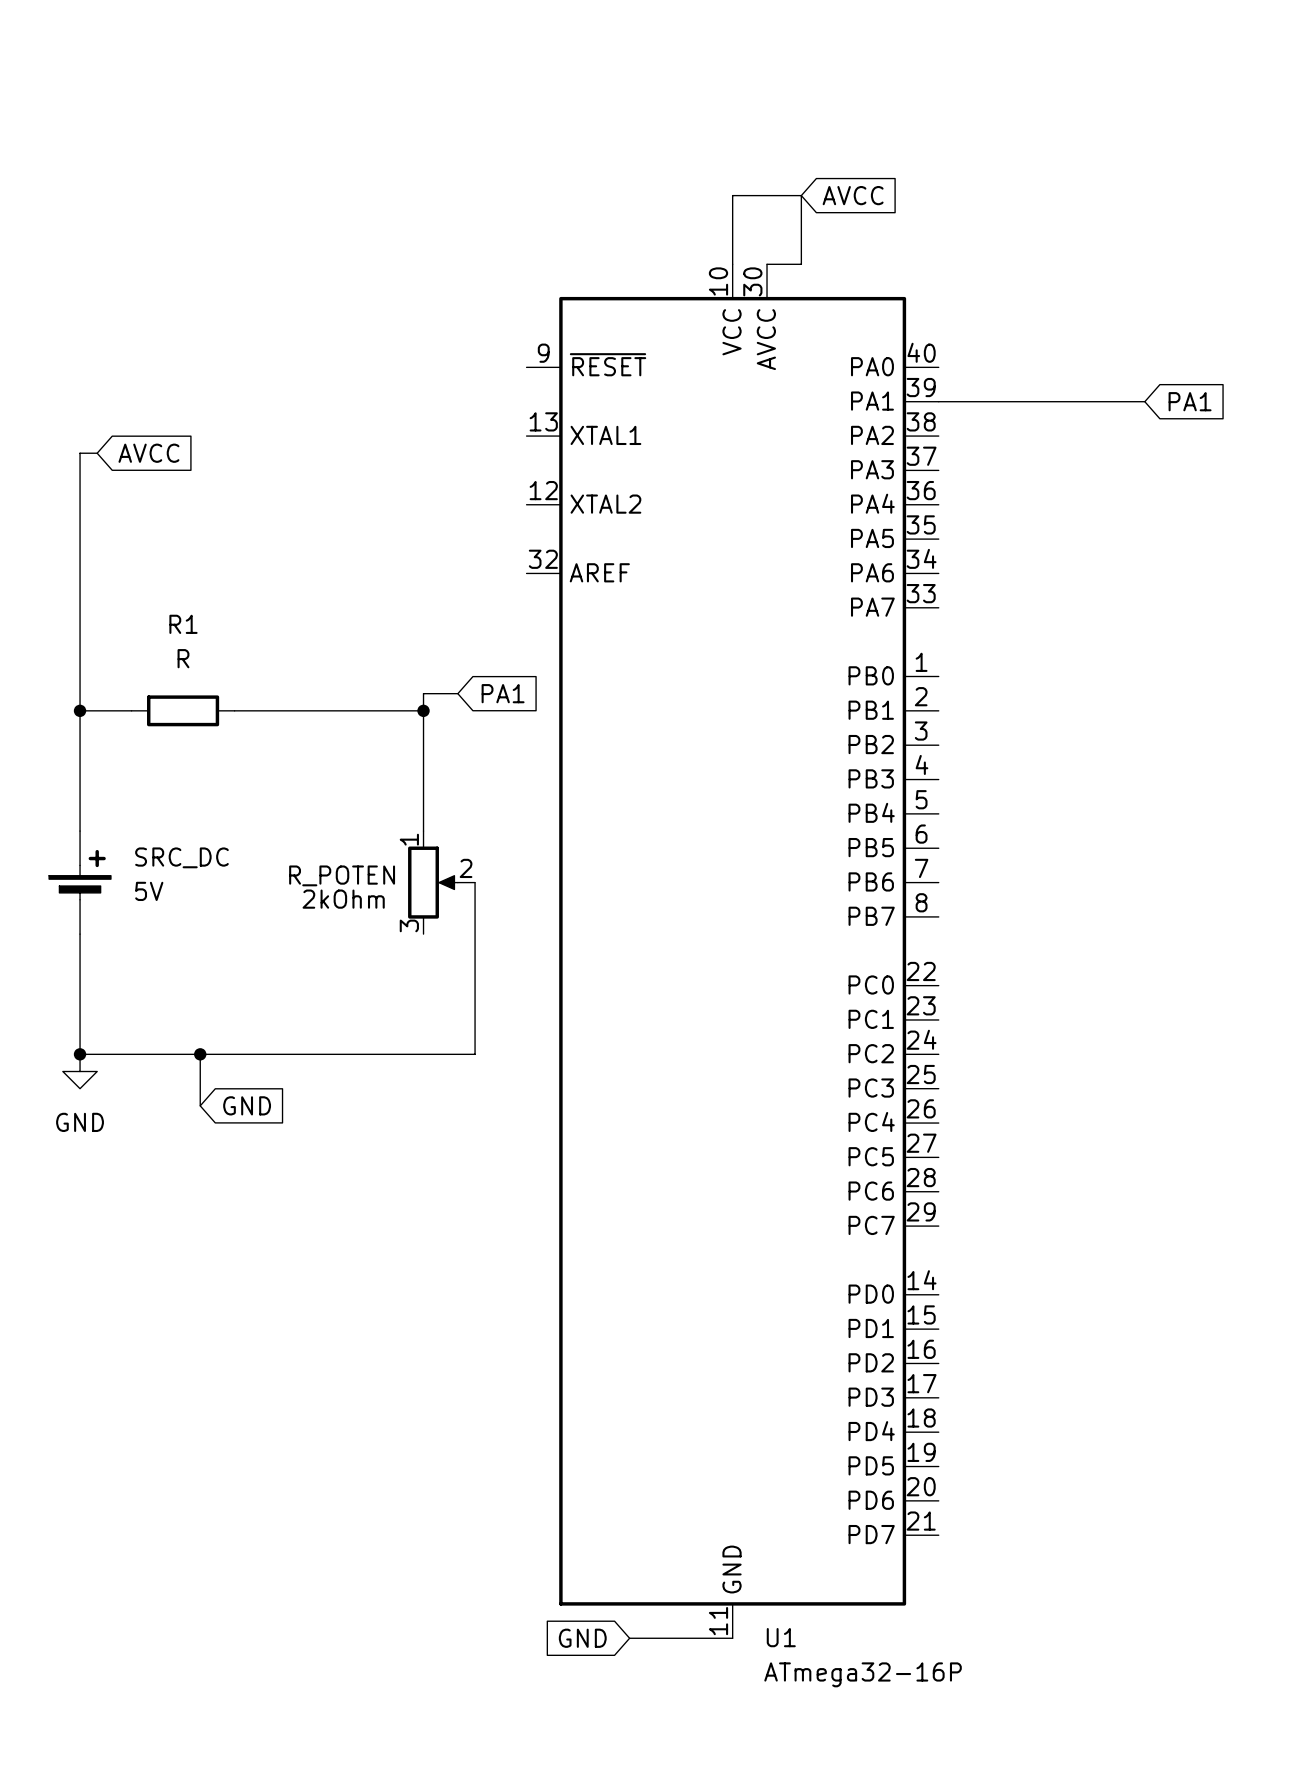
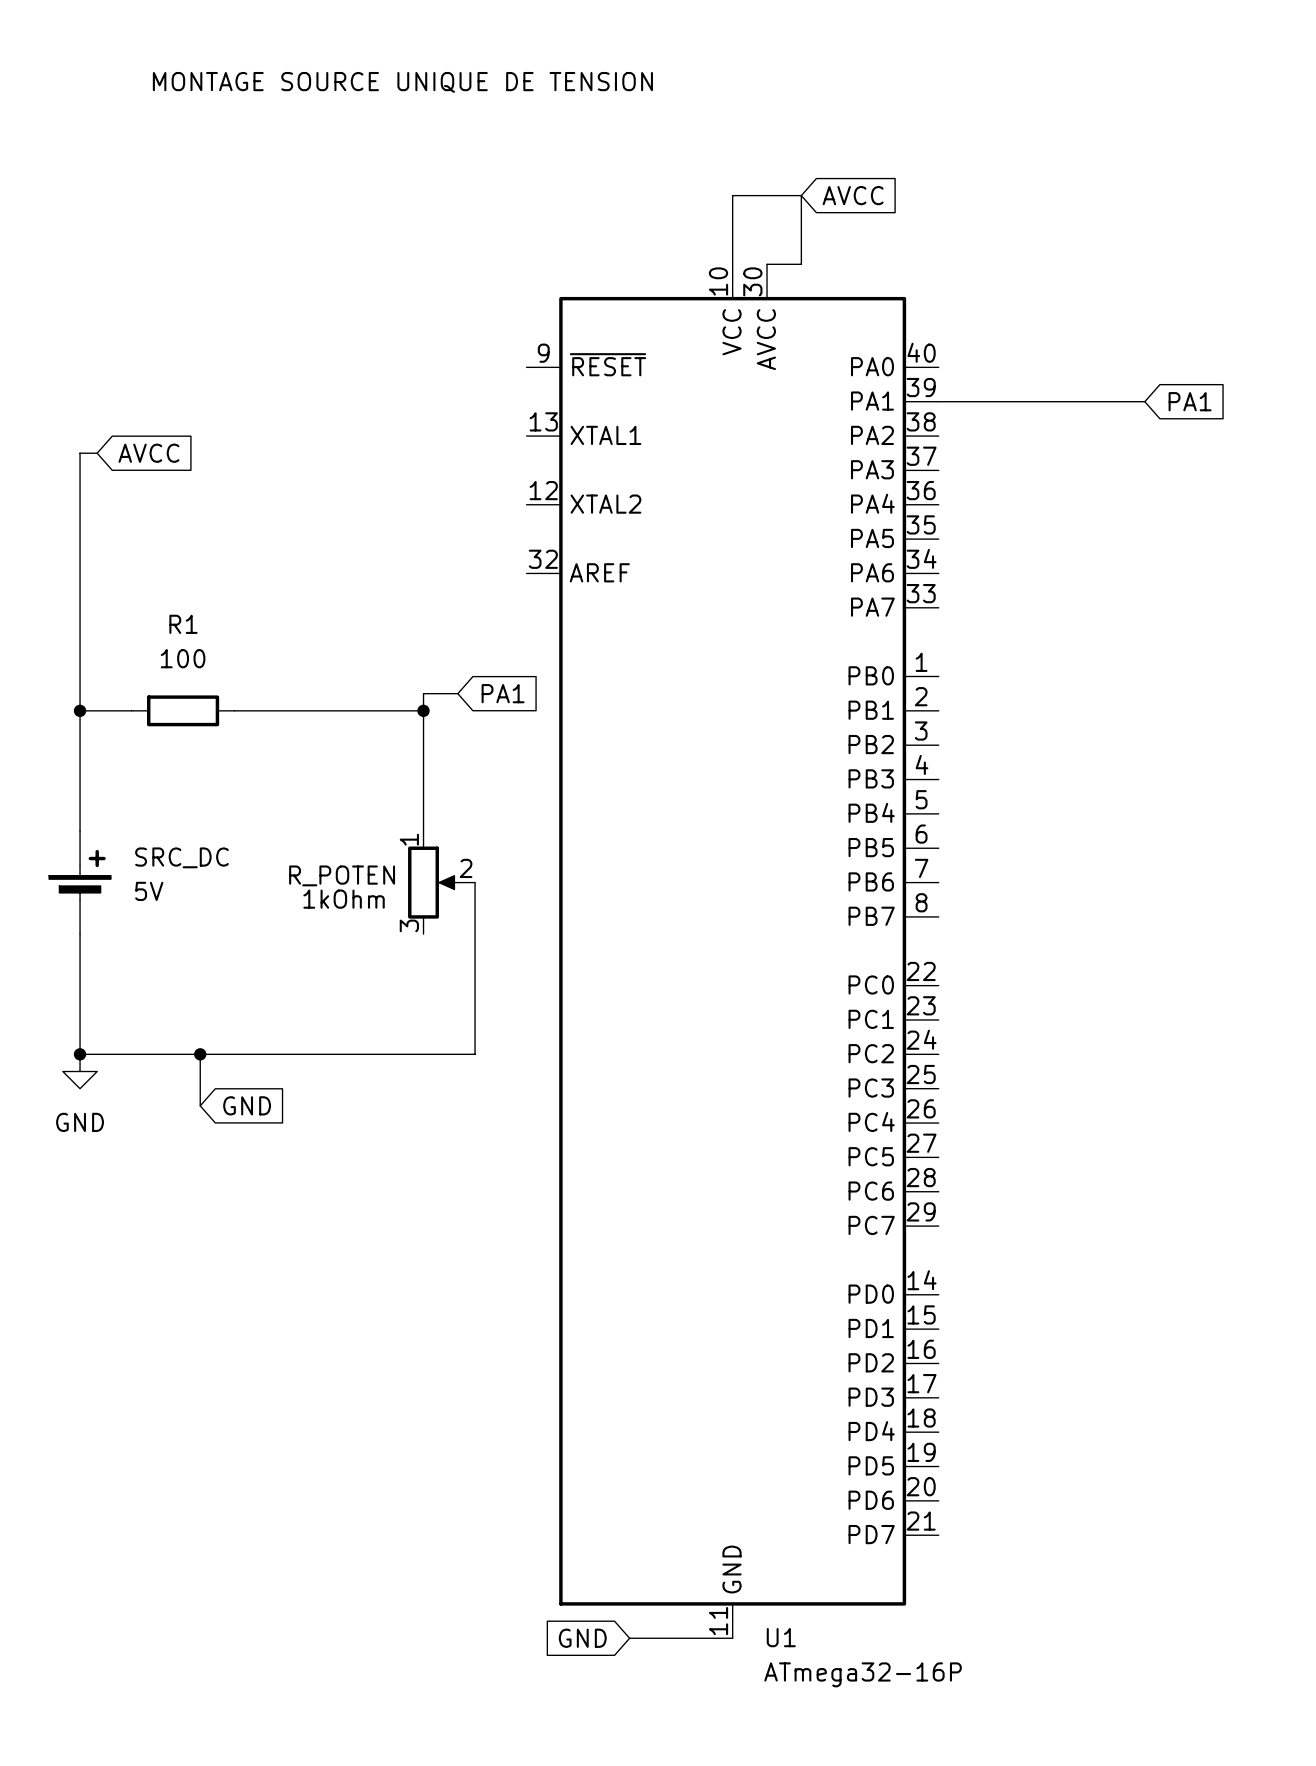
text: none -> MONTAGE SOURCE UNIQUE DE TENSION (402, 82)
R1 value: R (183, 658) -> 100 (183, 658)
R_POTEN value: 2kOhm (343, 899) -> 1kOhm (344, 899)

